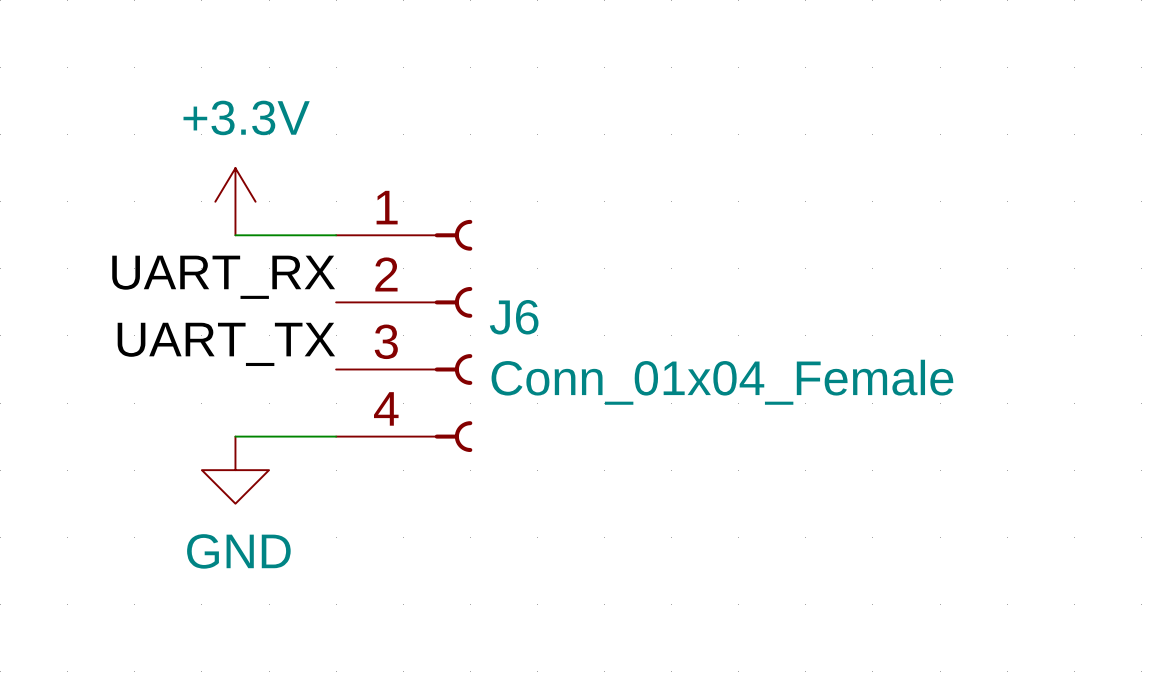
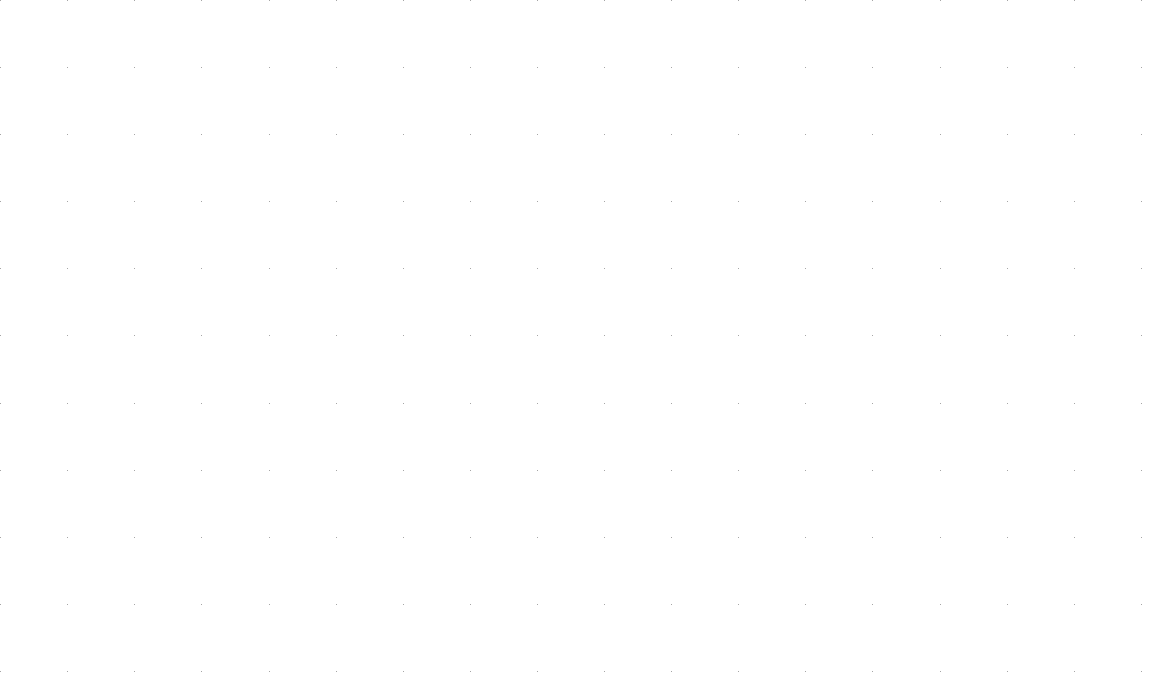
power symbol: +3.3V (235, 201) -> none
wire: (235, 235) (336, 235) -> none
label: UART_RX (223, 277) -> none
J6: Conn_01x04_Female (404, 335) -> none
label: UART_TX (226, 344) -> none
wire: (235, 436) (336, 436) -> none
power symbol: GND (235, 470) -> none

